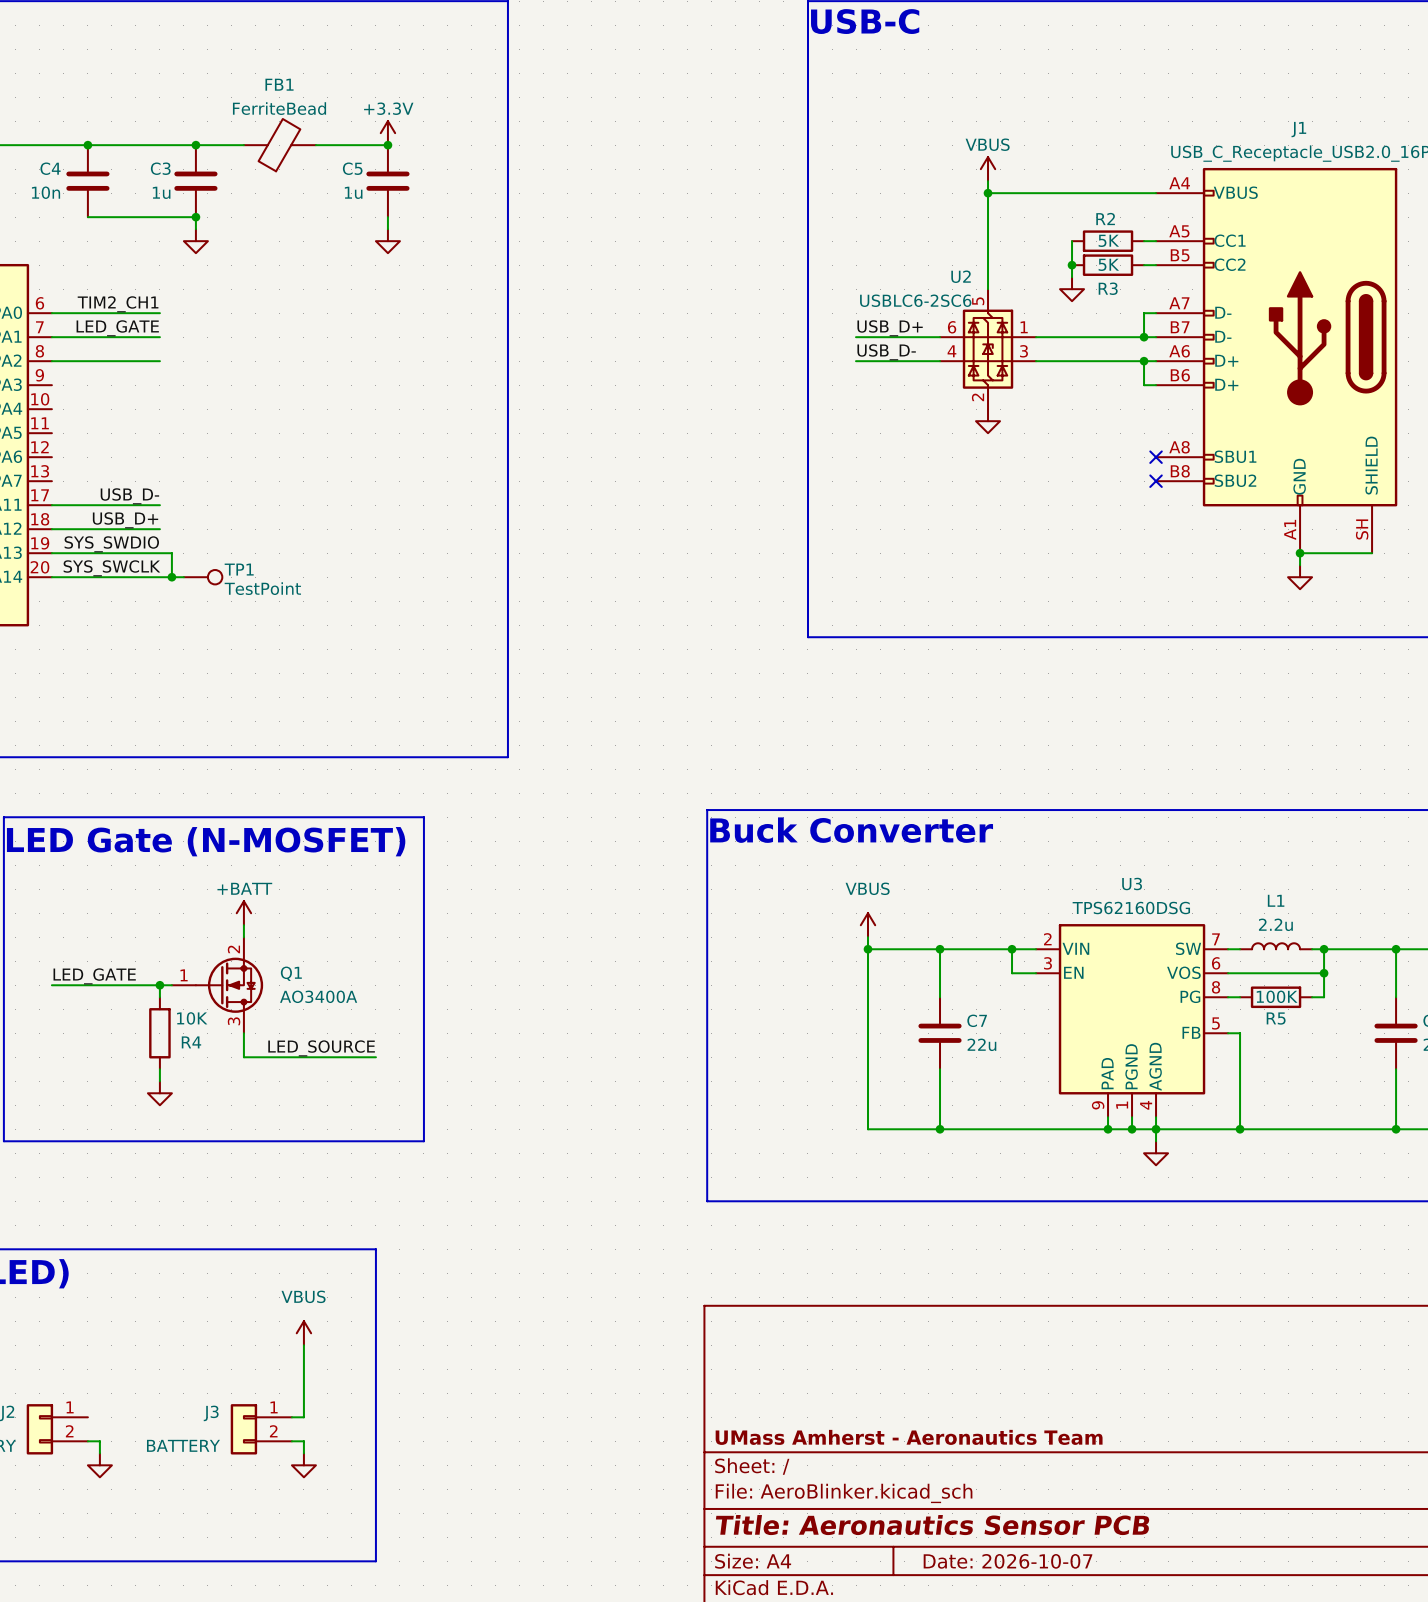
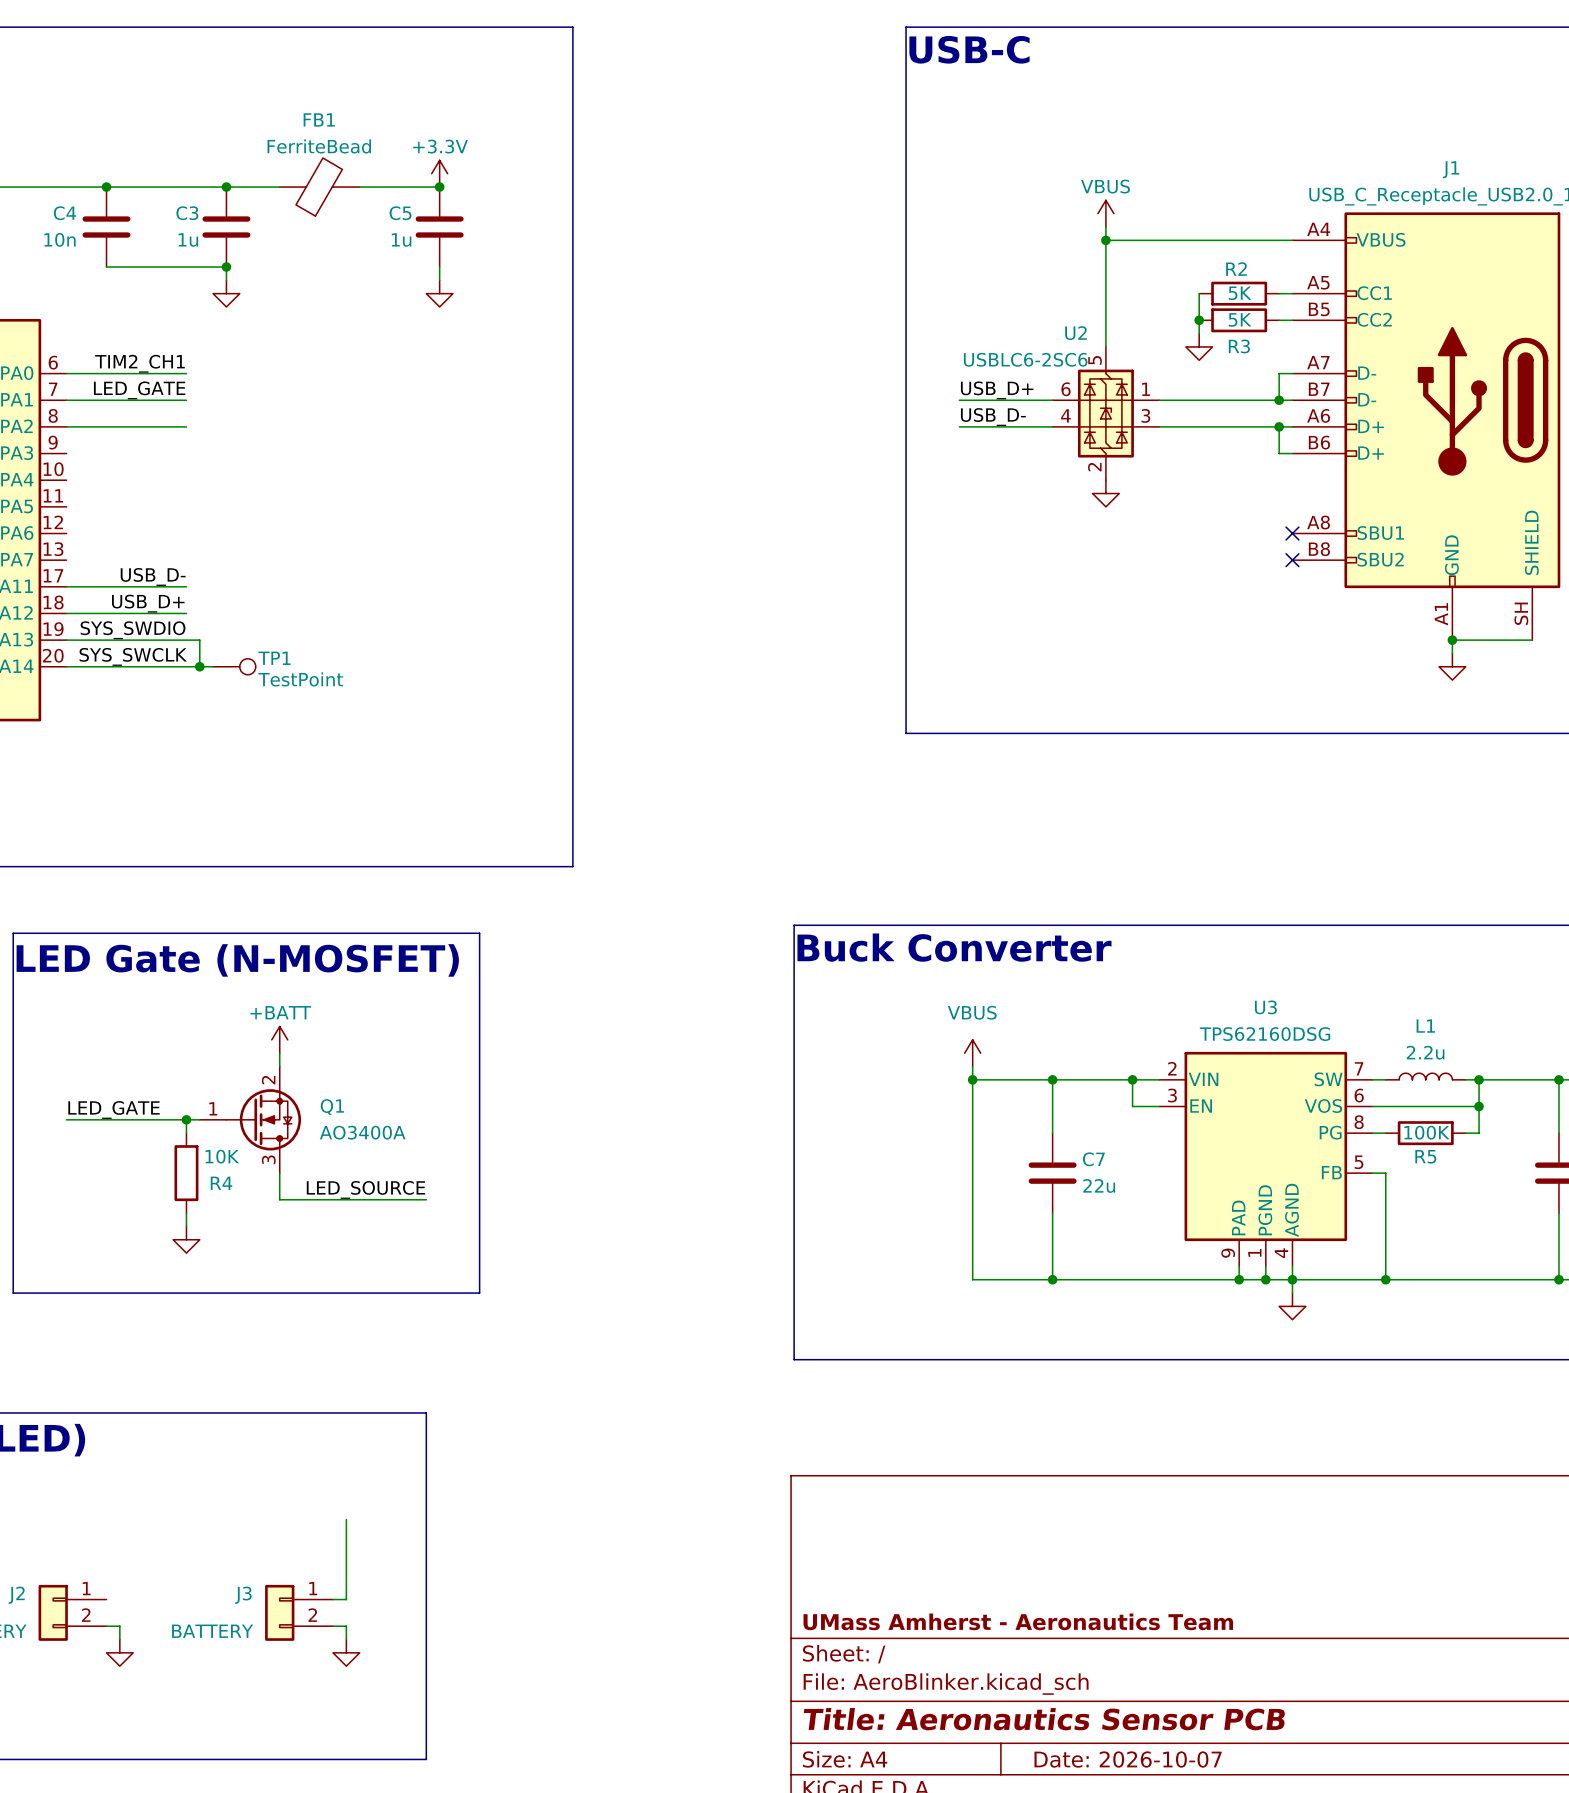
power symbol: VBUS (303, 1333) -> none

